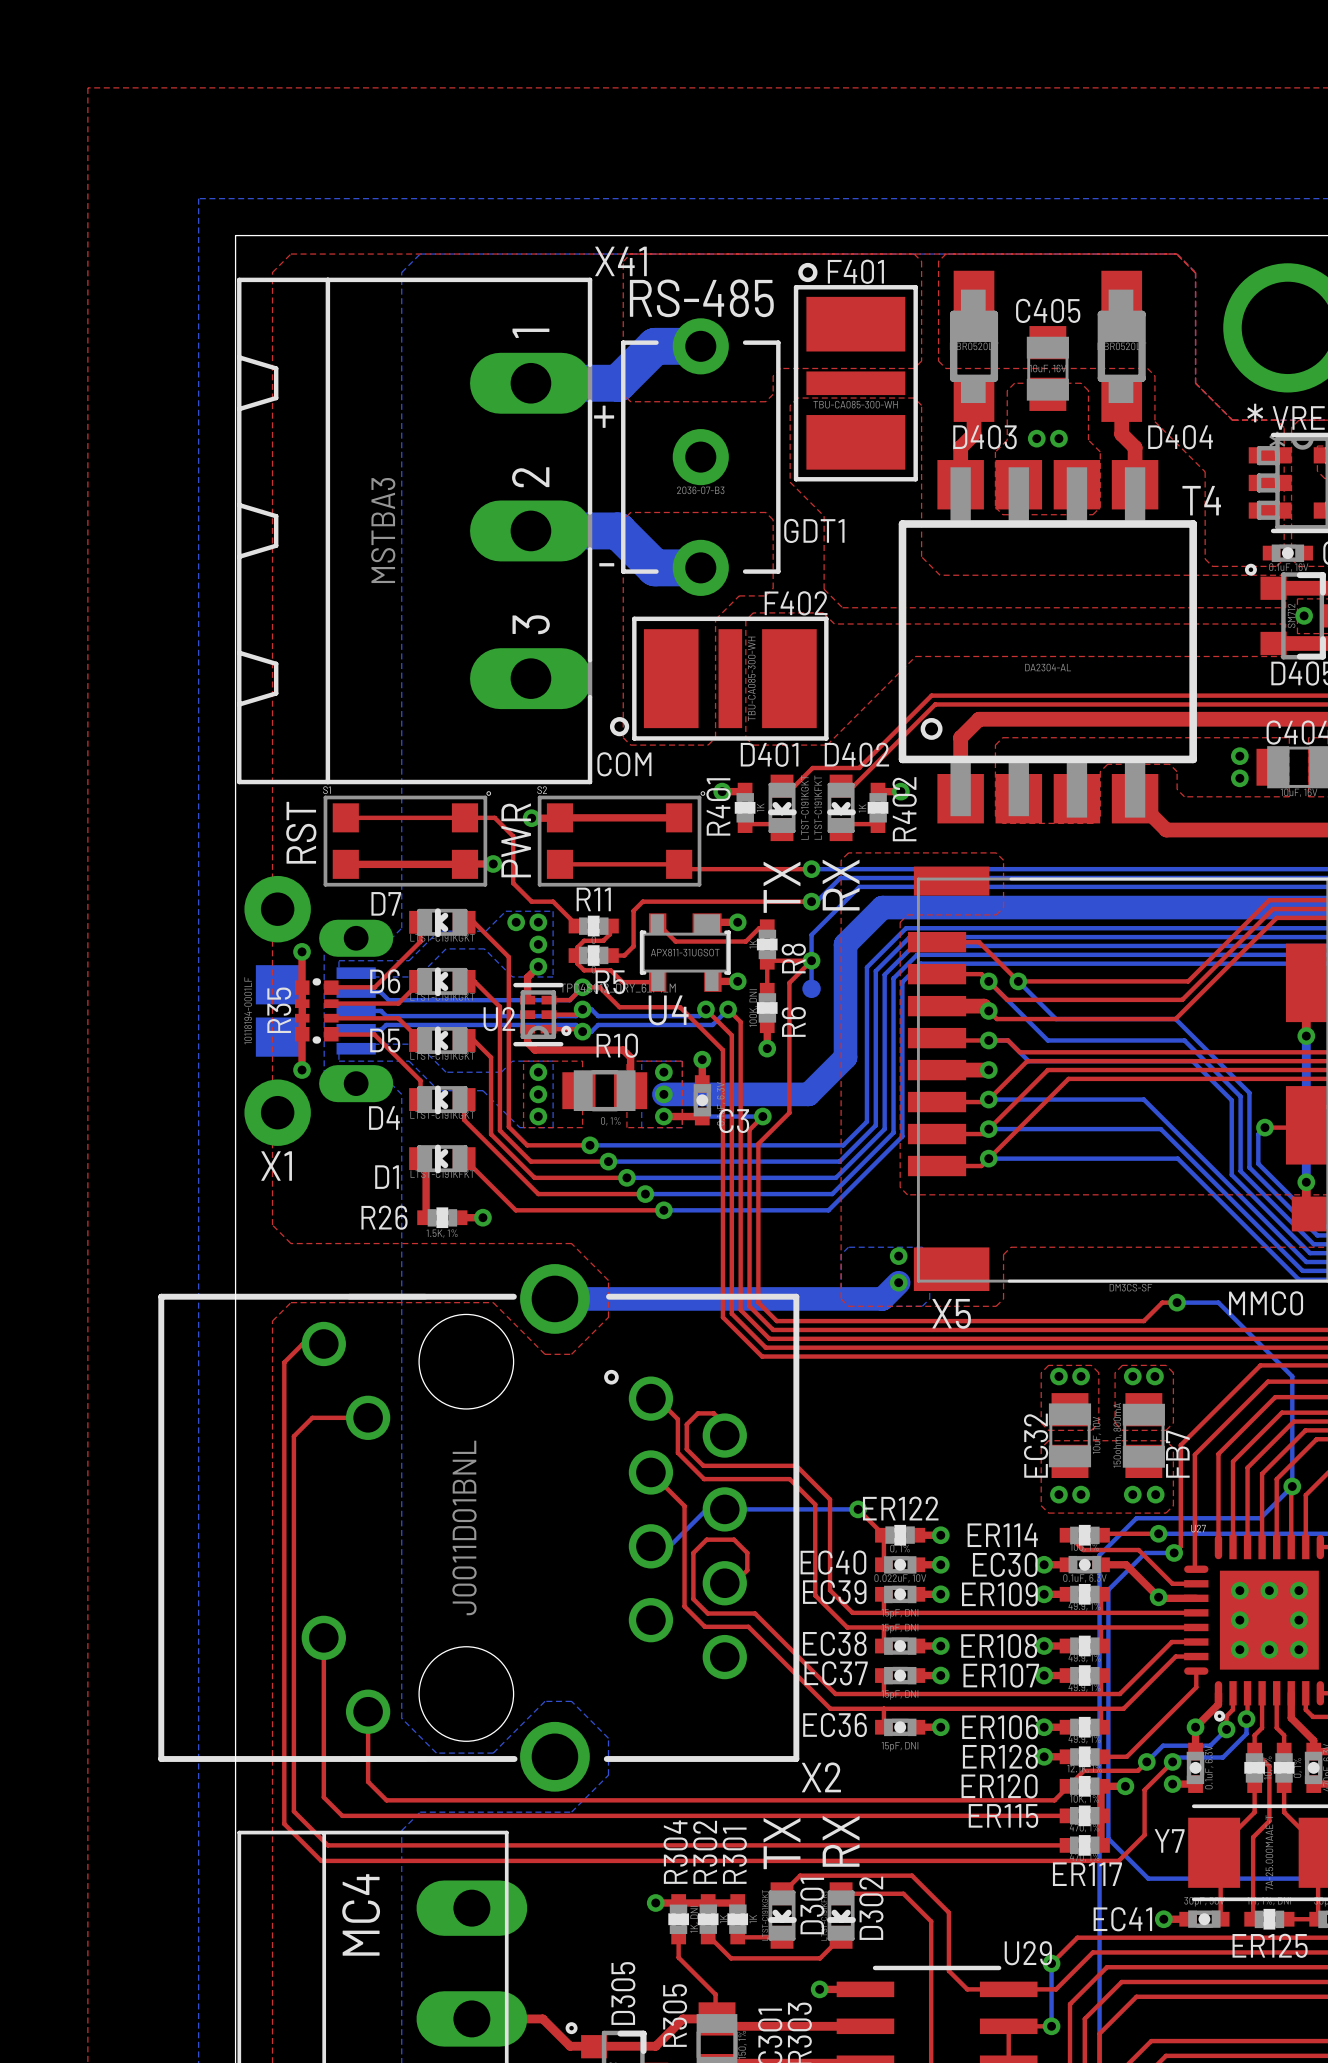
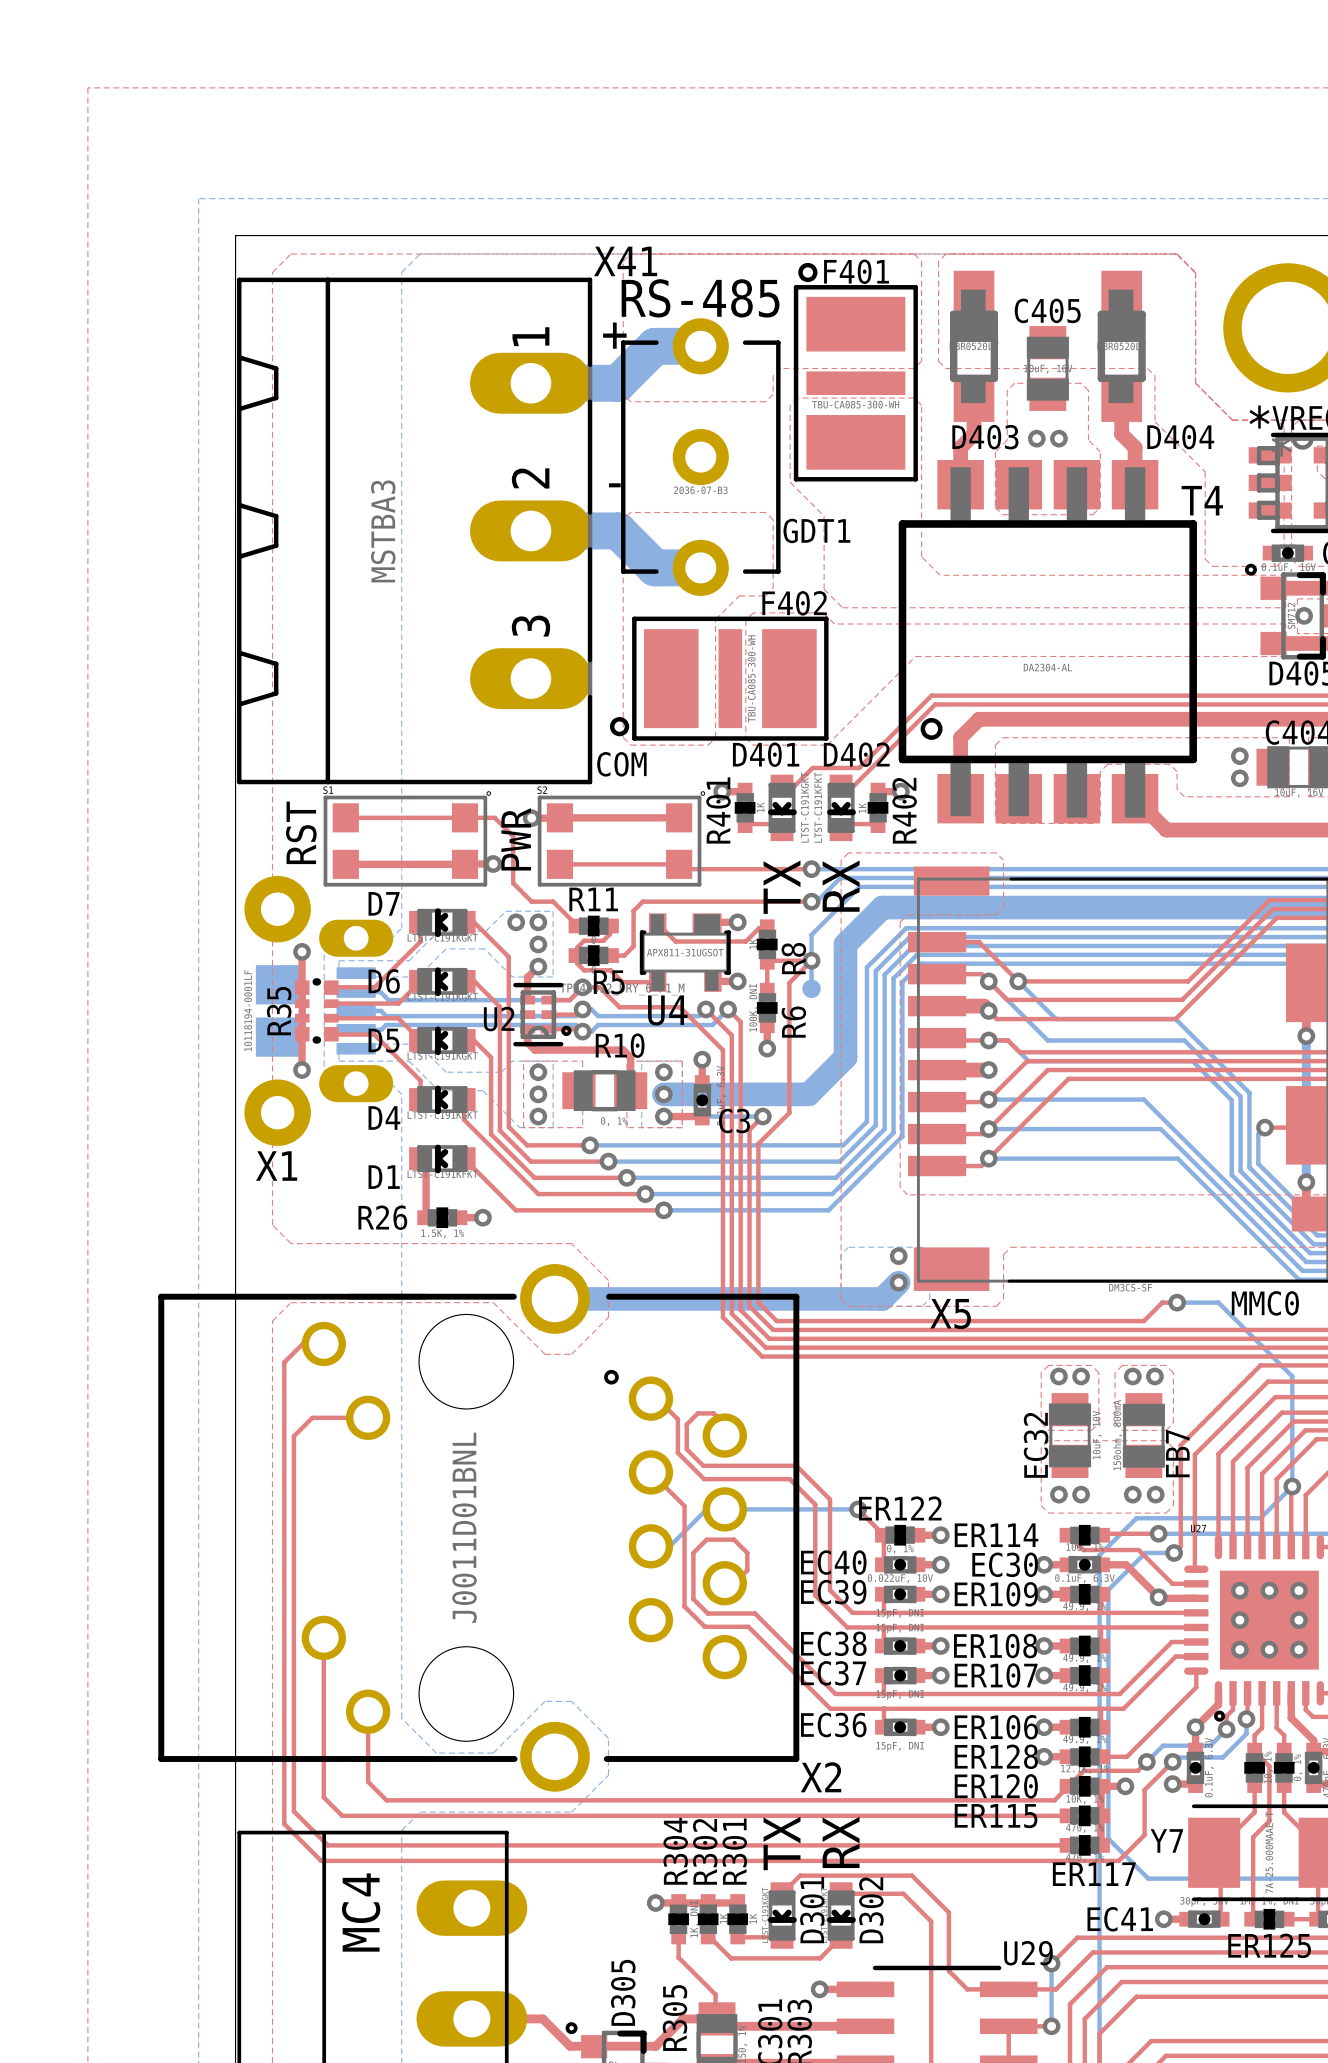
text position: + (604, 416) -> + (614, 335)
text position: - (606, 564) -> - (614, 485)

